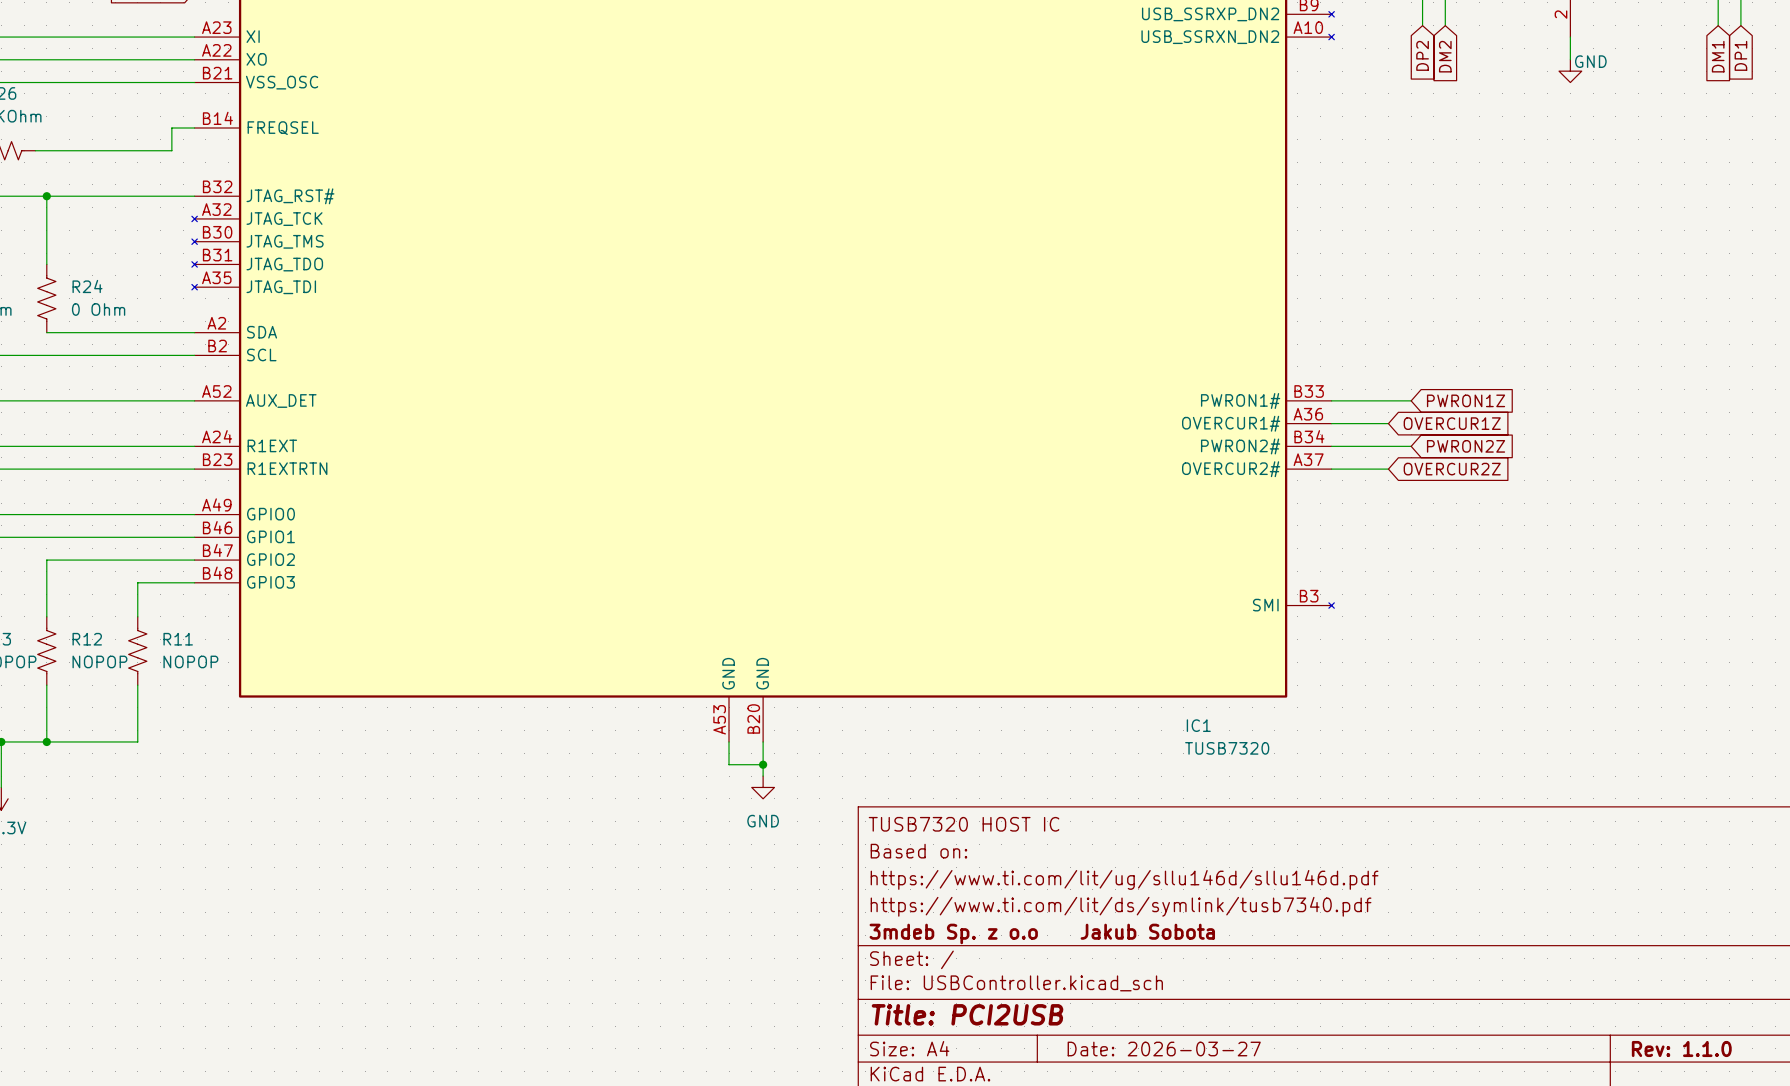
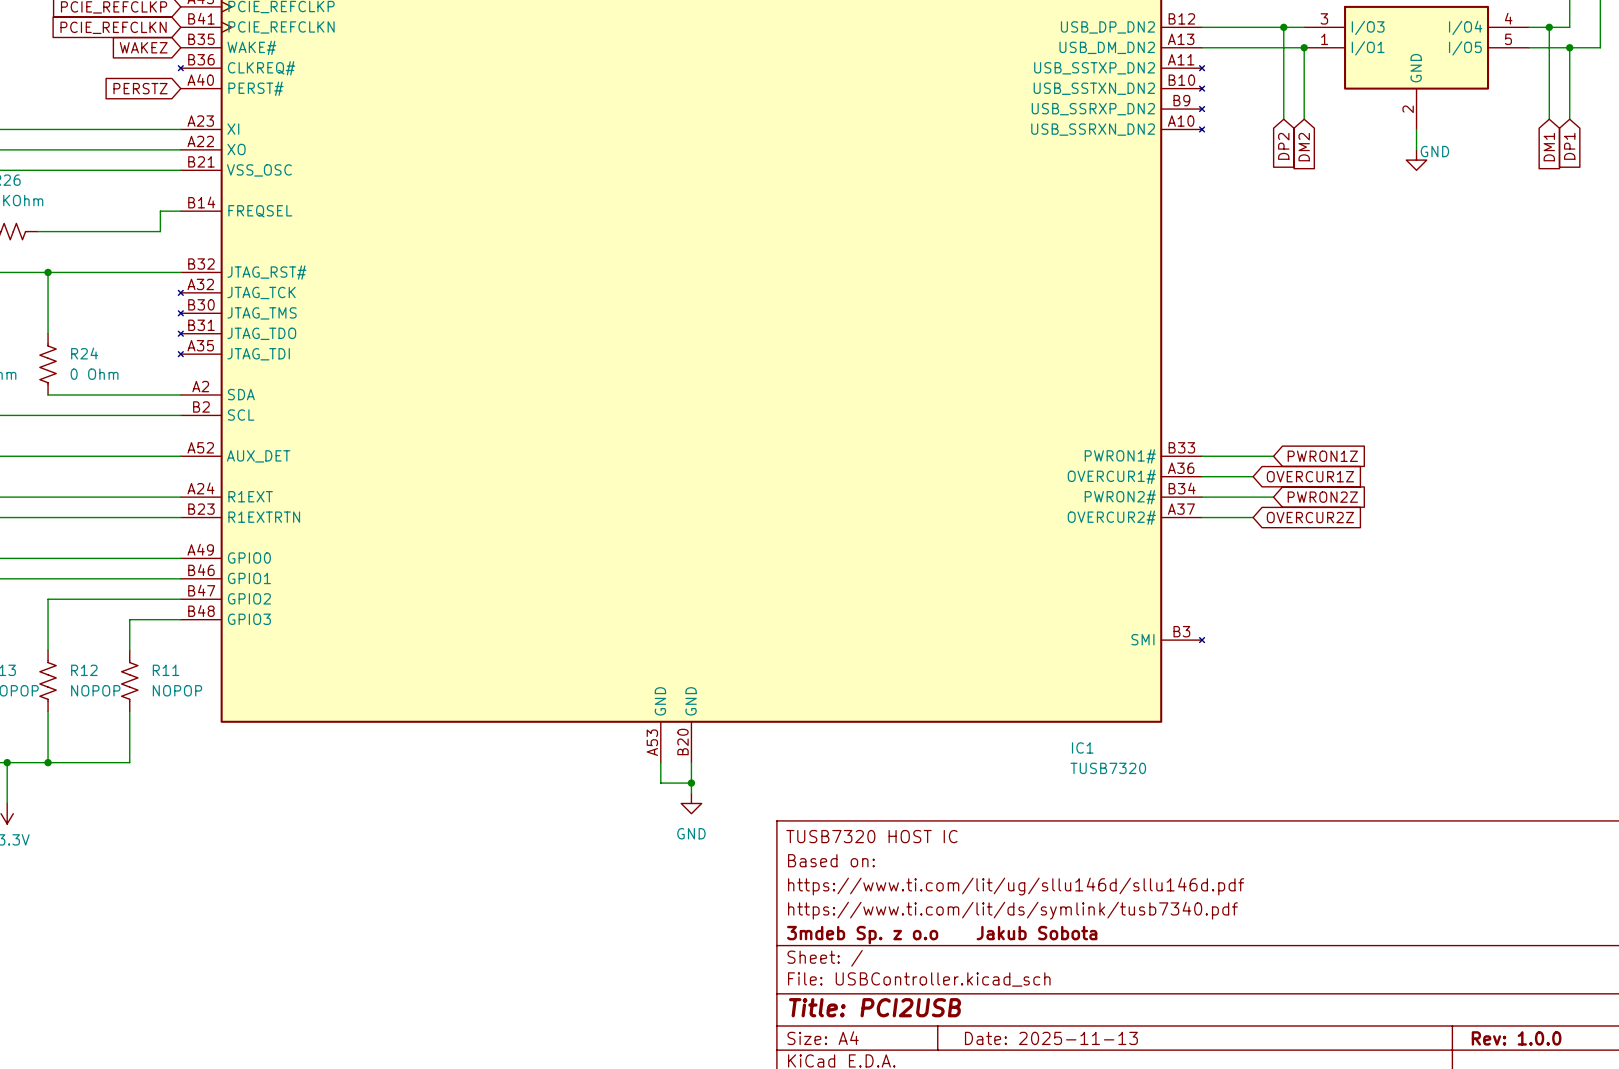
title block: Date: 2026-03-27 (1164, 1049) -> Date: 2025-11-13 (1051, 1038)
title block: Rev: 1.1.0 (1681, 1049) -> Rev: 1.0.0 (1516, 1038)

